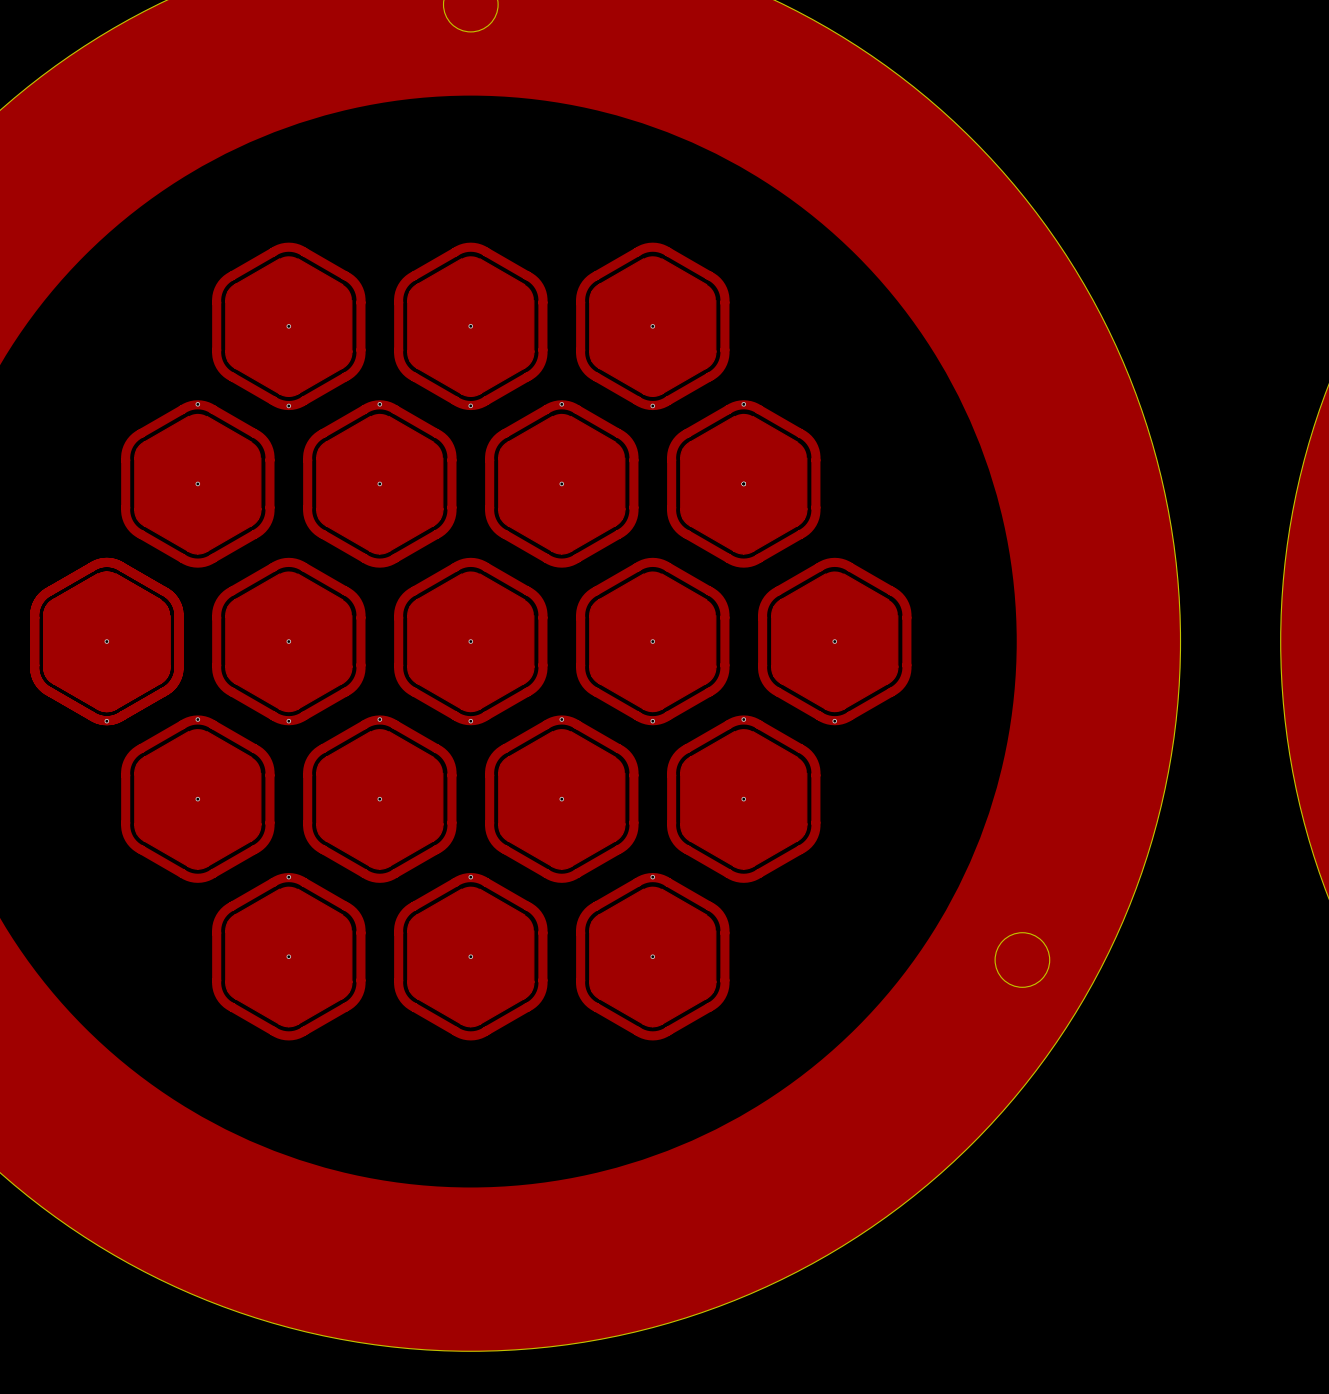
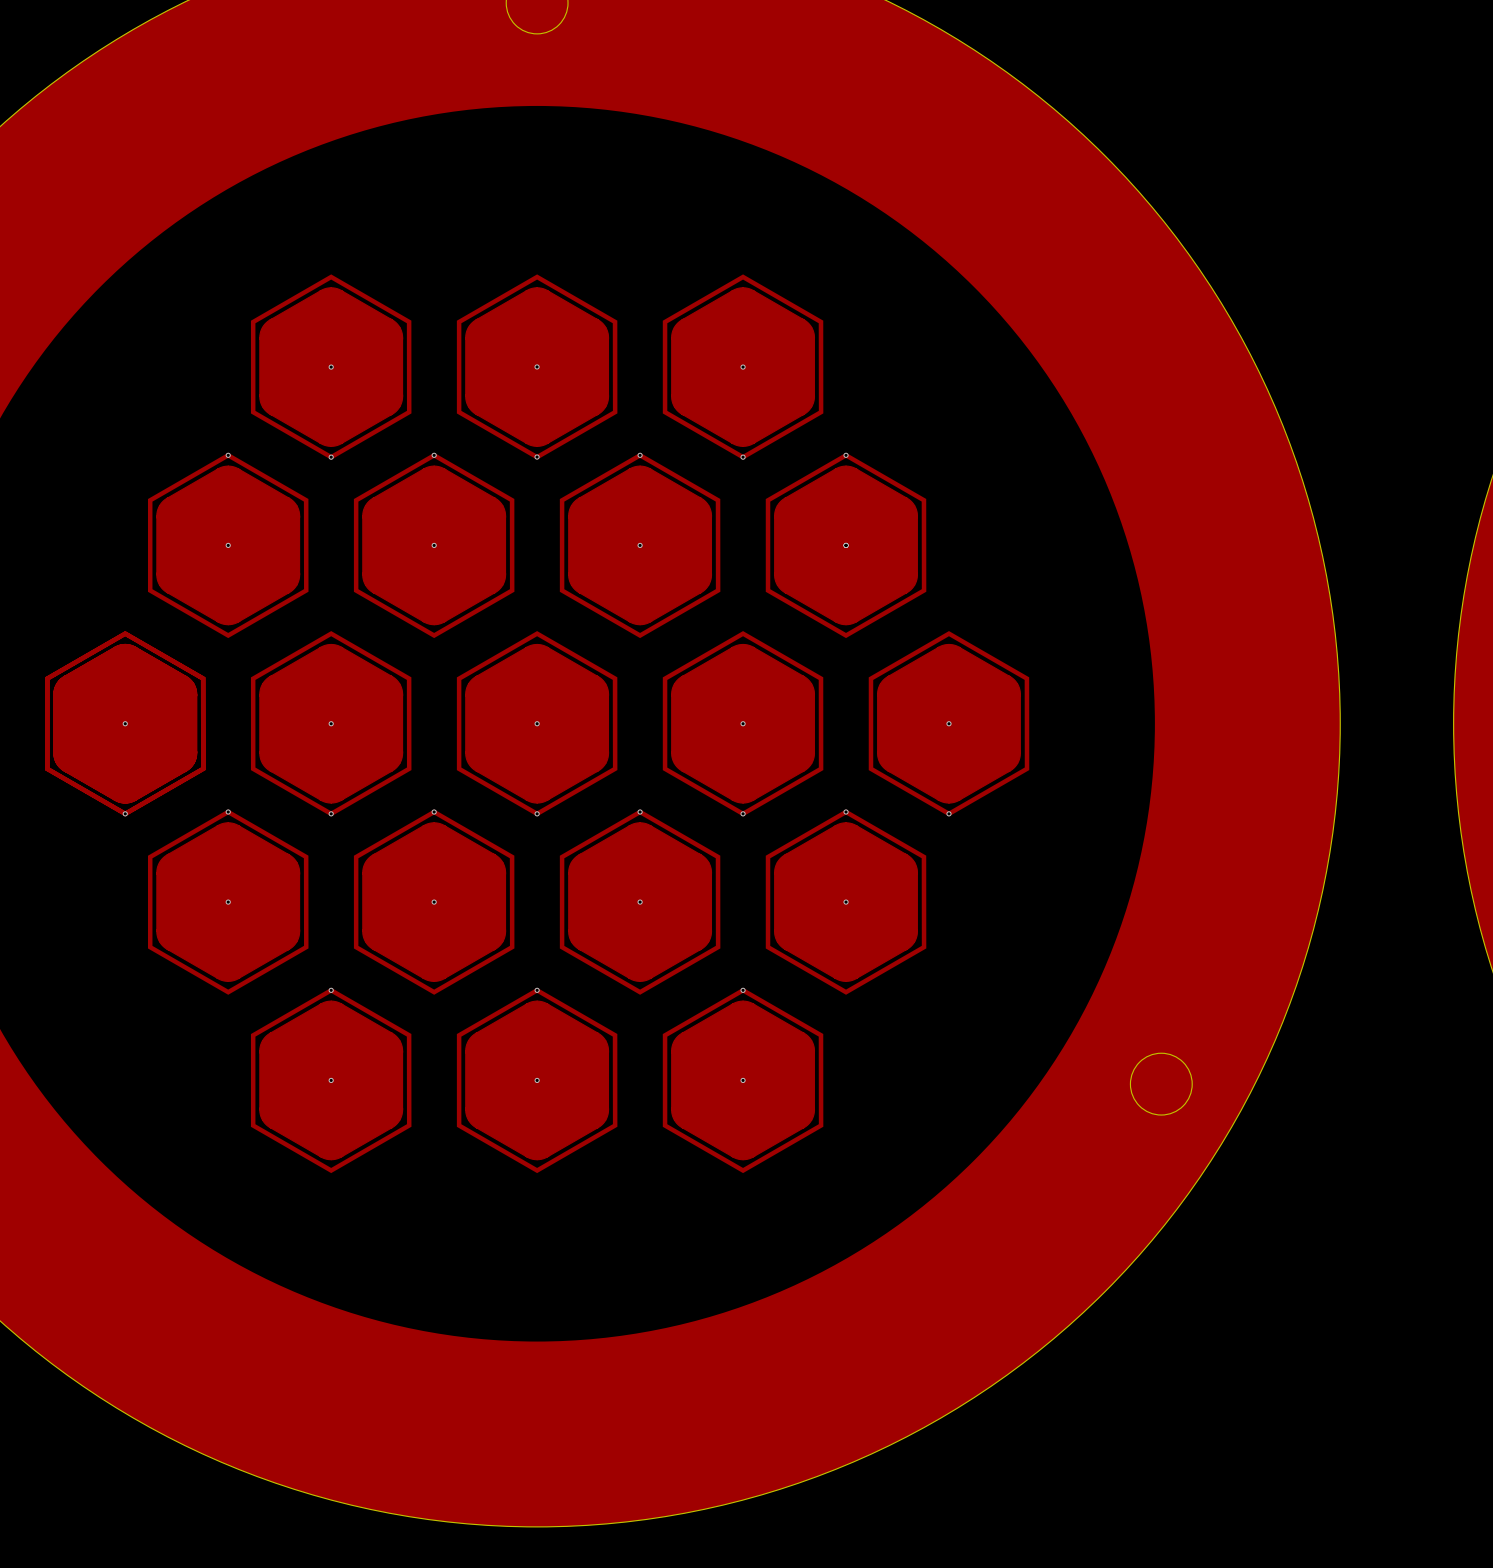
drawing shape: [212, 242, 366, 411] -> [250, 274, 412, 460]
drawing shape: [394, 242, 548, 411] -> [456, 274, 618, 460]
drawing shape: [576, 242, 730, 411] -> [662, 274, 824, 460]
drawing shape: [121, 400, 275, 568] -> [147, 452, 309, 639]
drawing shape: [303, 400, 457, 568] -> [353, 452, 515, 639]
drawing shape: [485, 400, 639, 568] -> [559, 452, 721, 639]
drawing shape: [667, 400, 821, 568] -> [765, 452, 927, 639]
drawing shape: [30, 557, 184, 726] -> [45, 631, 206, 817]
drawing shape: [212, 557, 366, 726] -> [250, 631, 412, 817]
drawing shape: [394, 557, 548, 726] -> [456, 631, 618, 817]
drawing shape: [576, 557, 730, 726] -> [662, 631, 824, 817]
drawing shape: [758, 557, 912, 726] -> [868, 631, 1030, 817]
drawing shape: [121, 715, 275, 883] -> [147, 809, 309, 995]
drawing shape: [303, 715, 457, 883] -> [353, 809, 515, 995]
drawing shape: [485, 715, 639, 883] -> [559, 809, 721, 995]
drawing shape: [667, 715, 821, 883] -> [765, 809, 927, 995]
drawing shape: [212, 873, 366, 1041] -> [250, 987, 412, 1174]
drawing shape: [394, 873, 548, 1041] -> [456, 987, 618, 1174]
drawing shape: [576, 873, 730, 1041] -> [662, 987, 824, 1174]

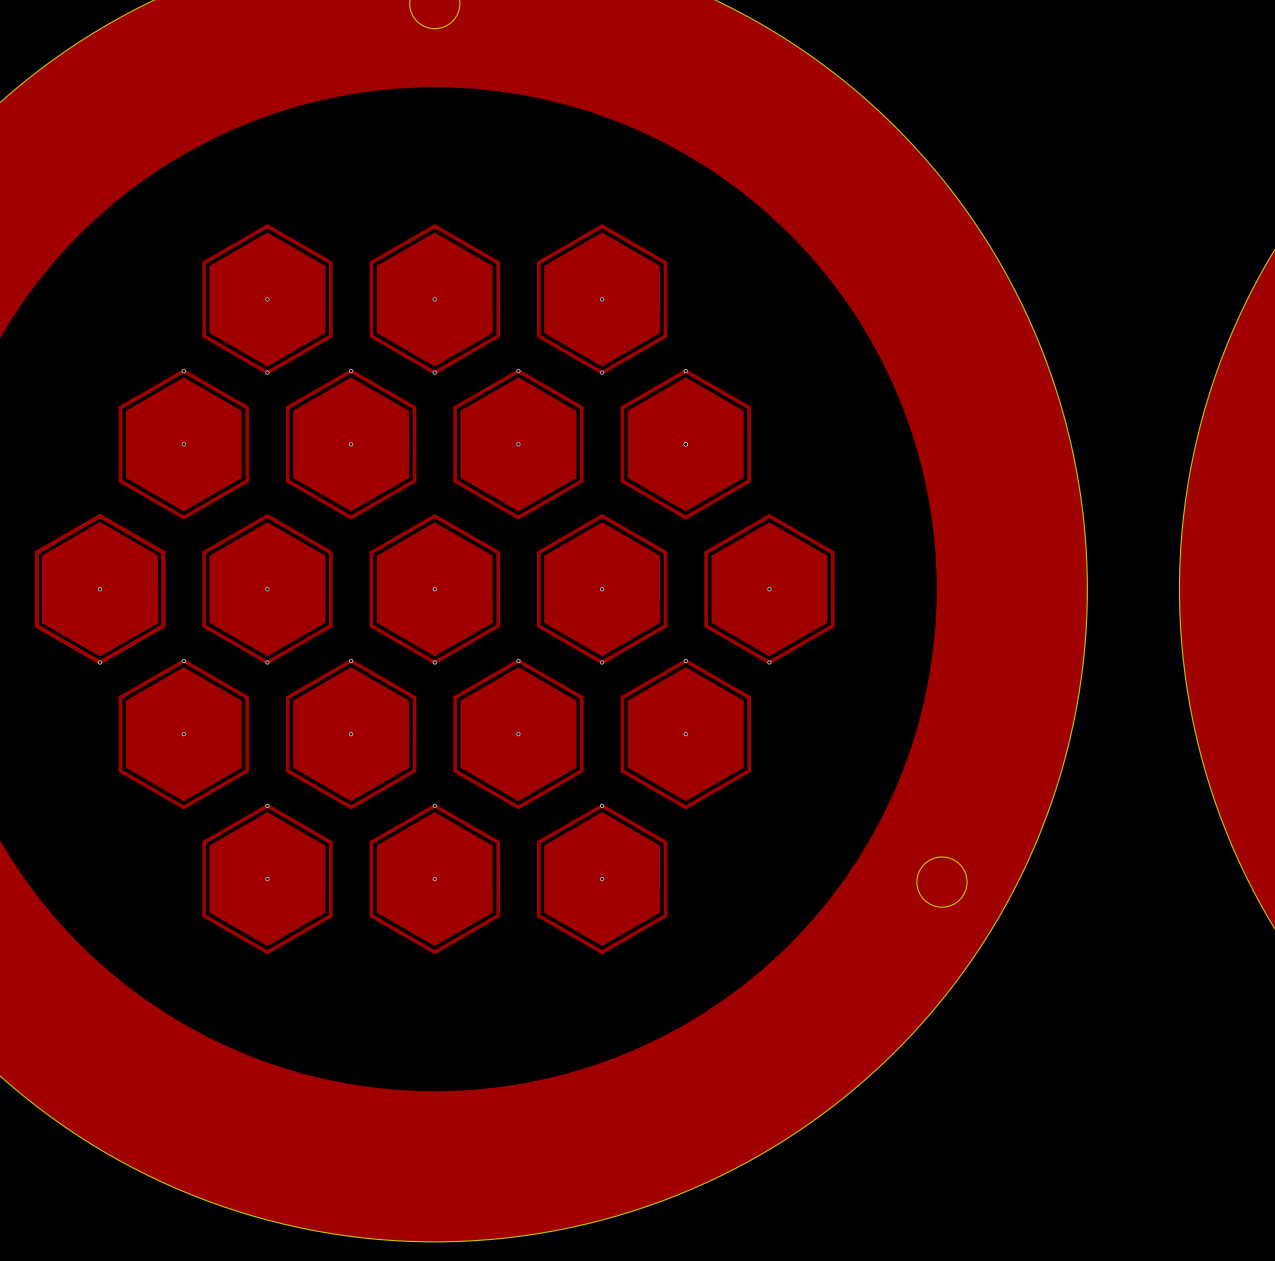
drawing shape: [250, 274, 412, 460] -> [202, 224, 333, 375]
drawing shape: [456, 274, 618, 460] -> [369, 224, 500, 375]
drawing shape: [662, 274, 824, 460] -> [536, 224, 668, 375]
drawing shape: [147, 452, 309, 639] -> [118, 369, 250, 520]
drawing shape: [353, 452, 515, 639] -> [285, 369, 417, 520]
drawing shape: [559, 452, 721, 639] -> [453, 369, 584, 520]
drawing shape: [765, 452, 927, 639] -> [620, 369, 751, 520]
drawing shape: [45, 631, 206, 817] -> [34, 513, 166, 665]
drawing shape: [250, 631, 412, 817] -> [202, 513, 333, 665]
drawing shape: [456, 631, 618, 817] -> [369, 513, 500, 665]
drawing shape: [662, 631, 824, 817] -> [536, 513, 668, 665]
drawing shape: [868, 631, 1030, 817] -> [704, 513, 835, 665]
drawing shape: [147, 809, 309, 995] -> [118, 658, 250, 810]
drawing shape: [353, 809, 515, 995] -> [285, 658, 417, 810]
drawing shape: [559, 809, 721, 995] -> [453, 658, 584, 810]
drawing shape: [765, 809, 927, 995] -> [620, 658, 751, 810]
drawing shape: [250, 987, 412, 1174] -> [202, 803, 333, 955]
drawing shape: [456, 987, 618, 1174] -> [369, 803, 500, 955]
drawing shape: [662, 987, 824, 1174] -> [536, 803, 668, 955]

